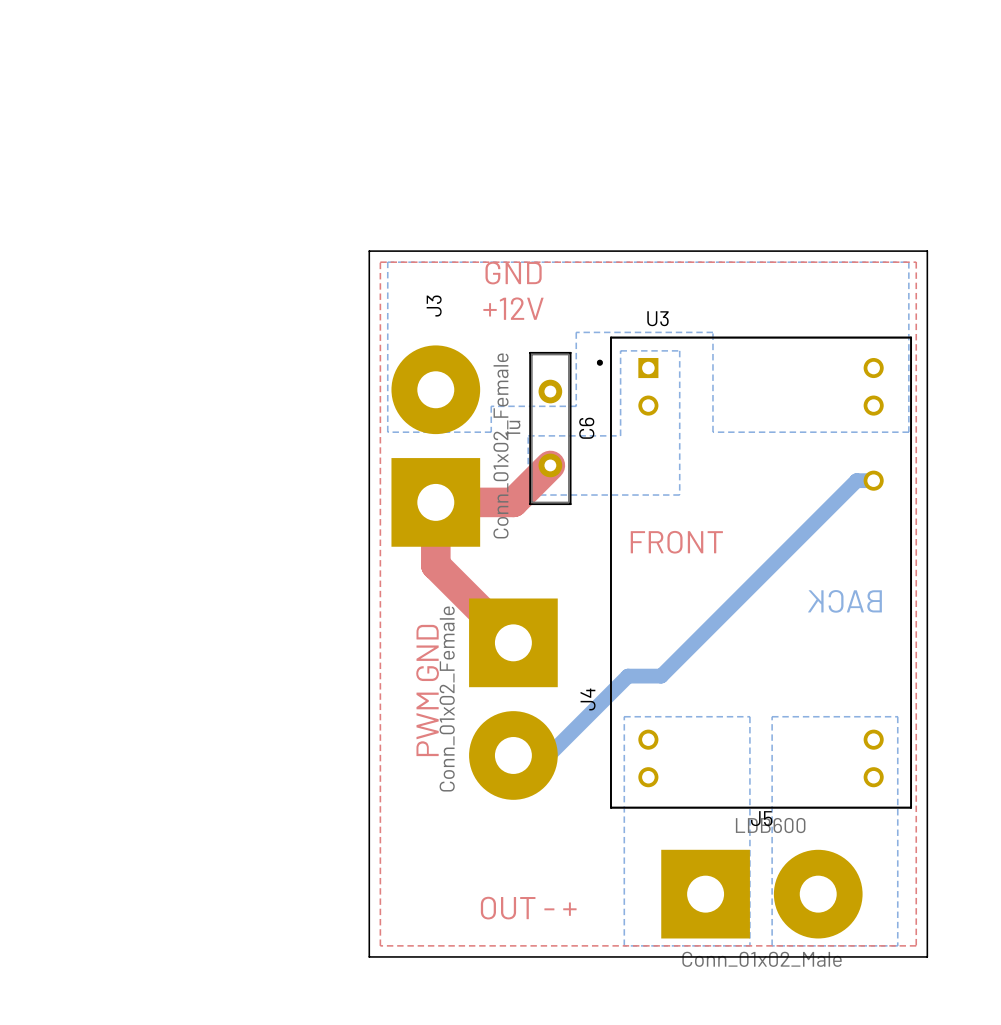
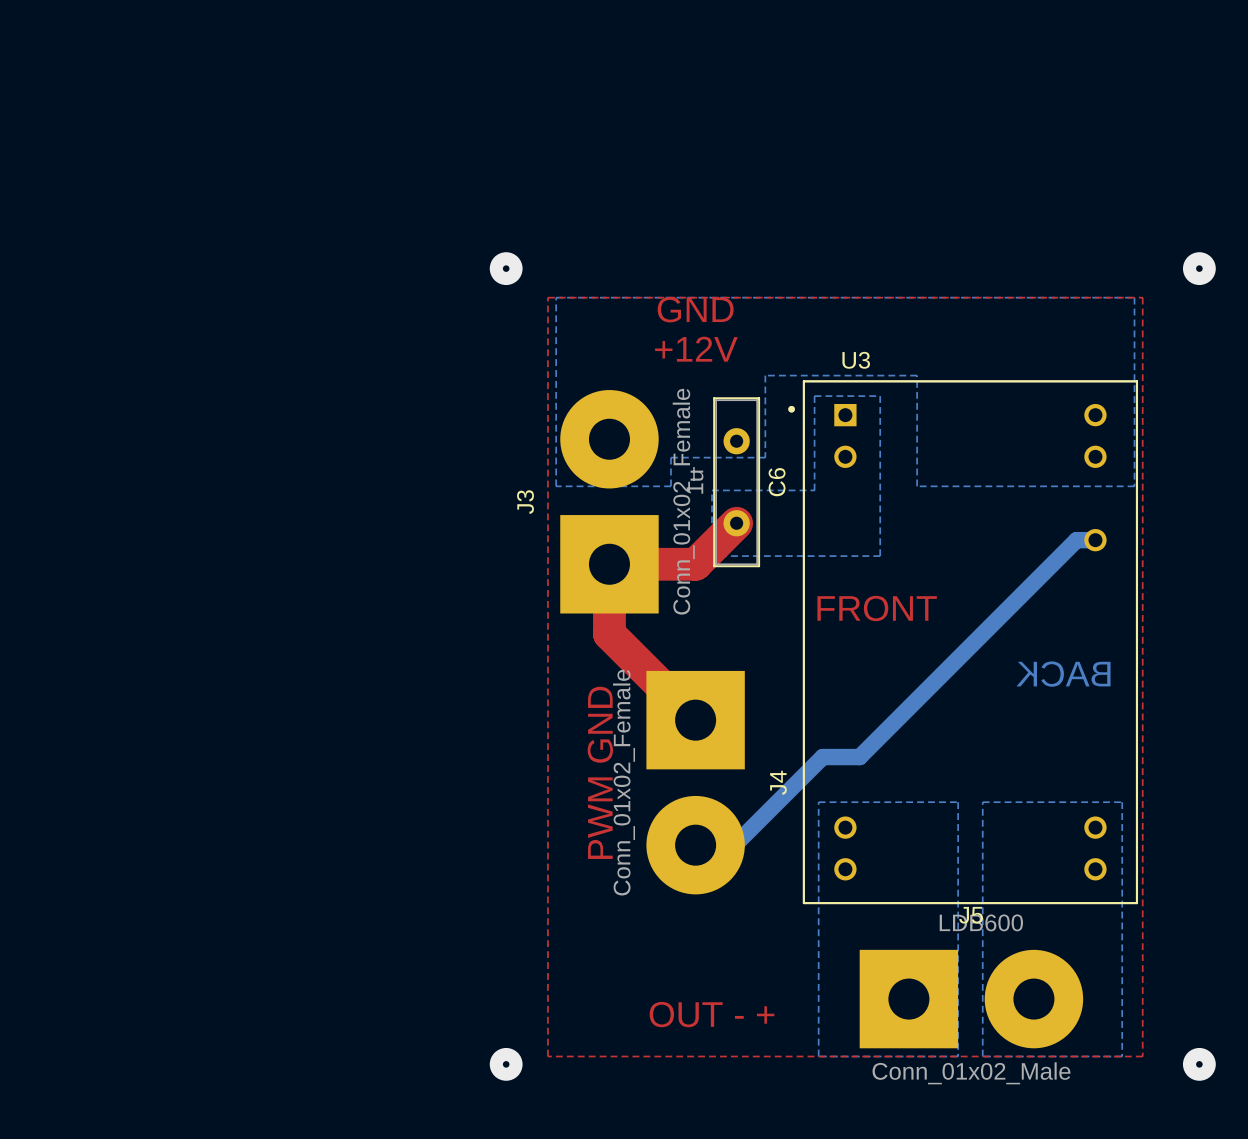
via: none -> (506, 268)
via: none -> (1199, 268)
board edge: (369, 251) (927, 251) (927, 956) (369, 956) (369, 251) -> none
J3 name position: J3 (434, 306) -> J3 (525, 502)
via: none -> (506, 1064)
via: none -> (1199, 1064)

